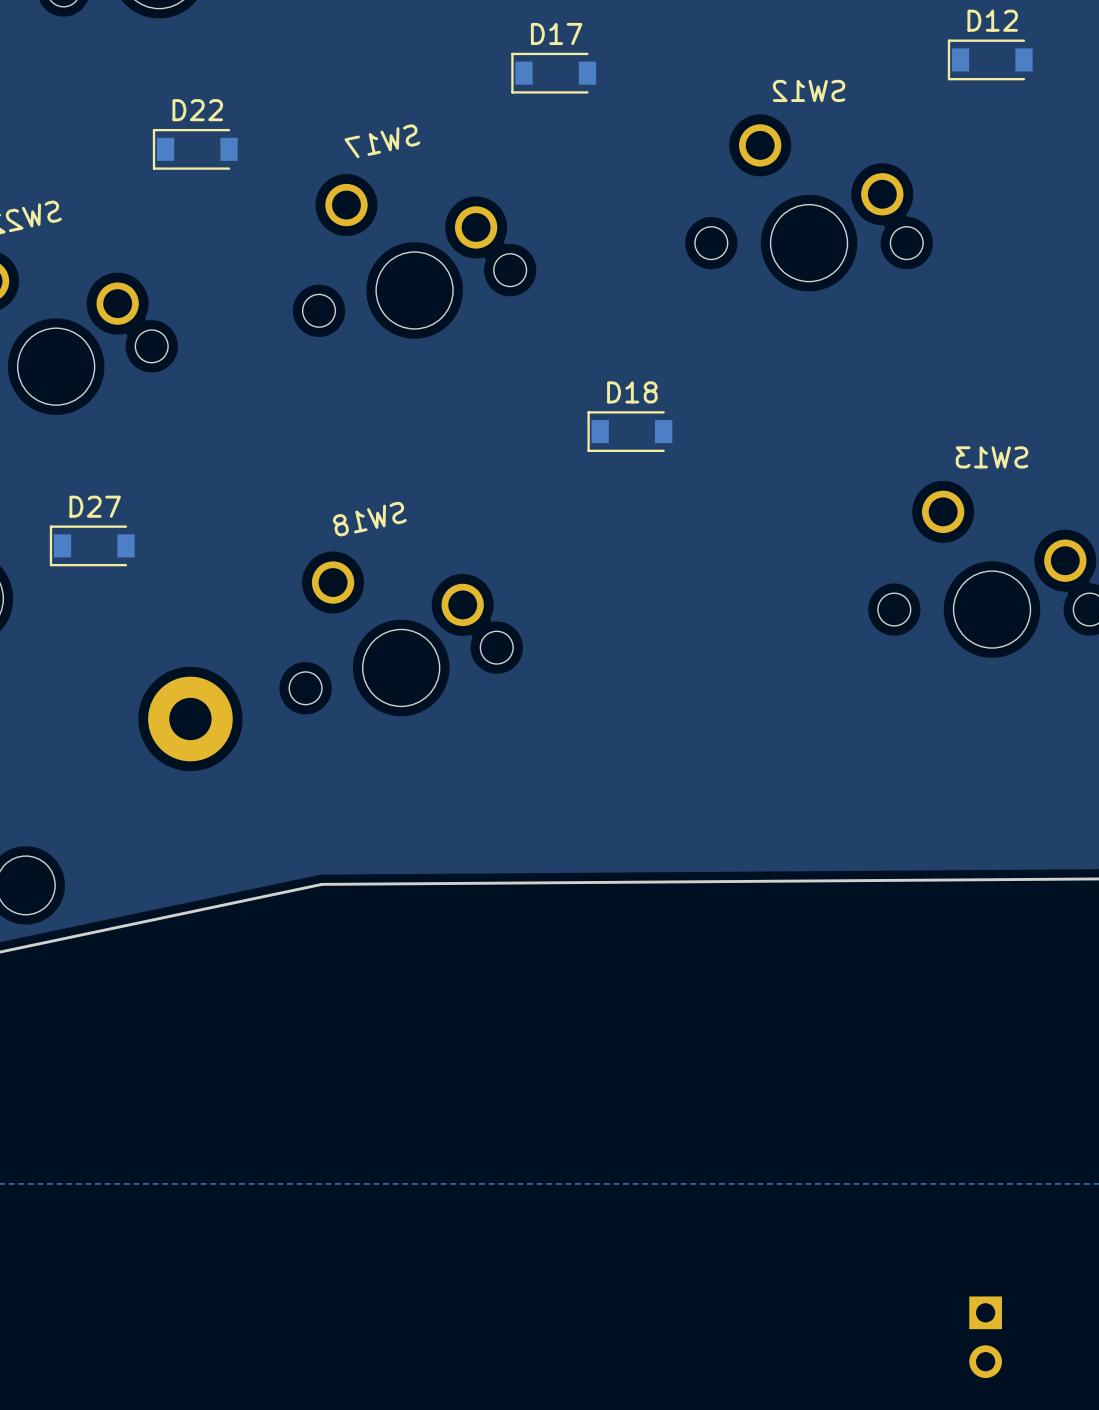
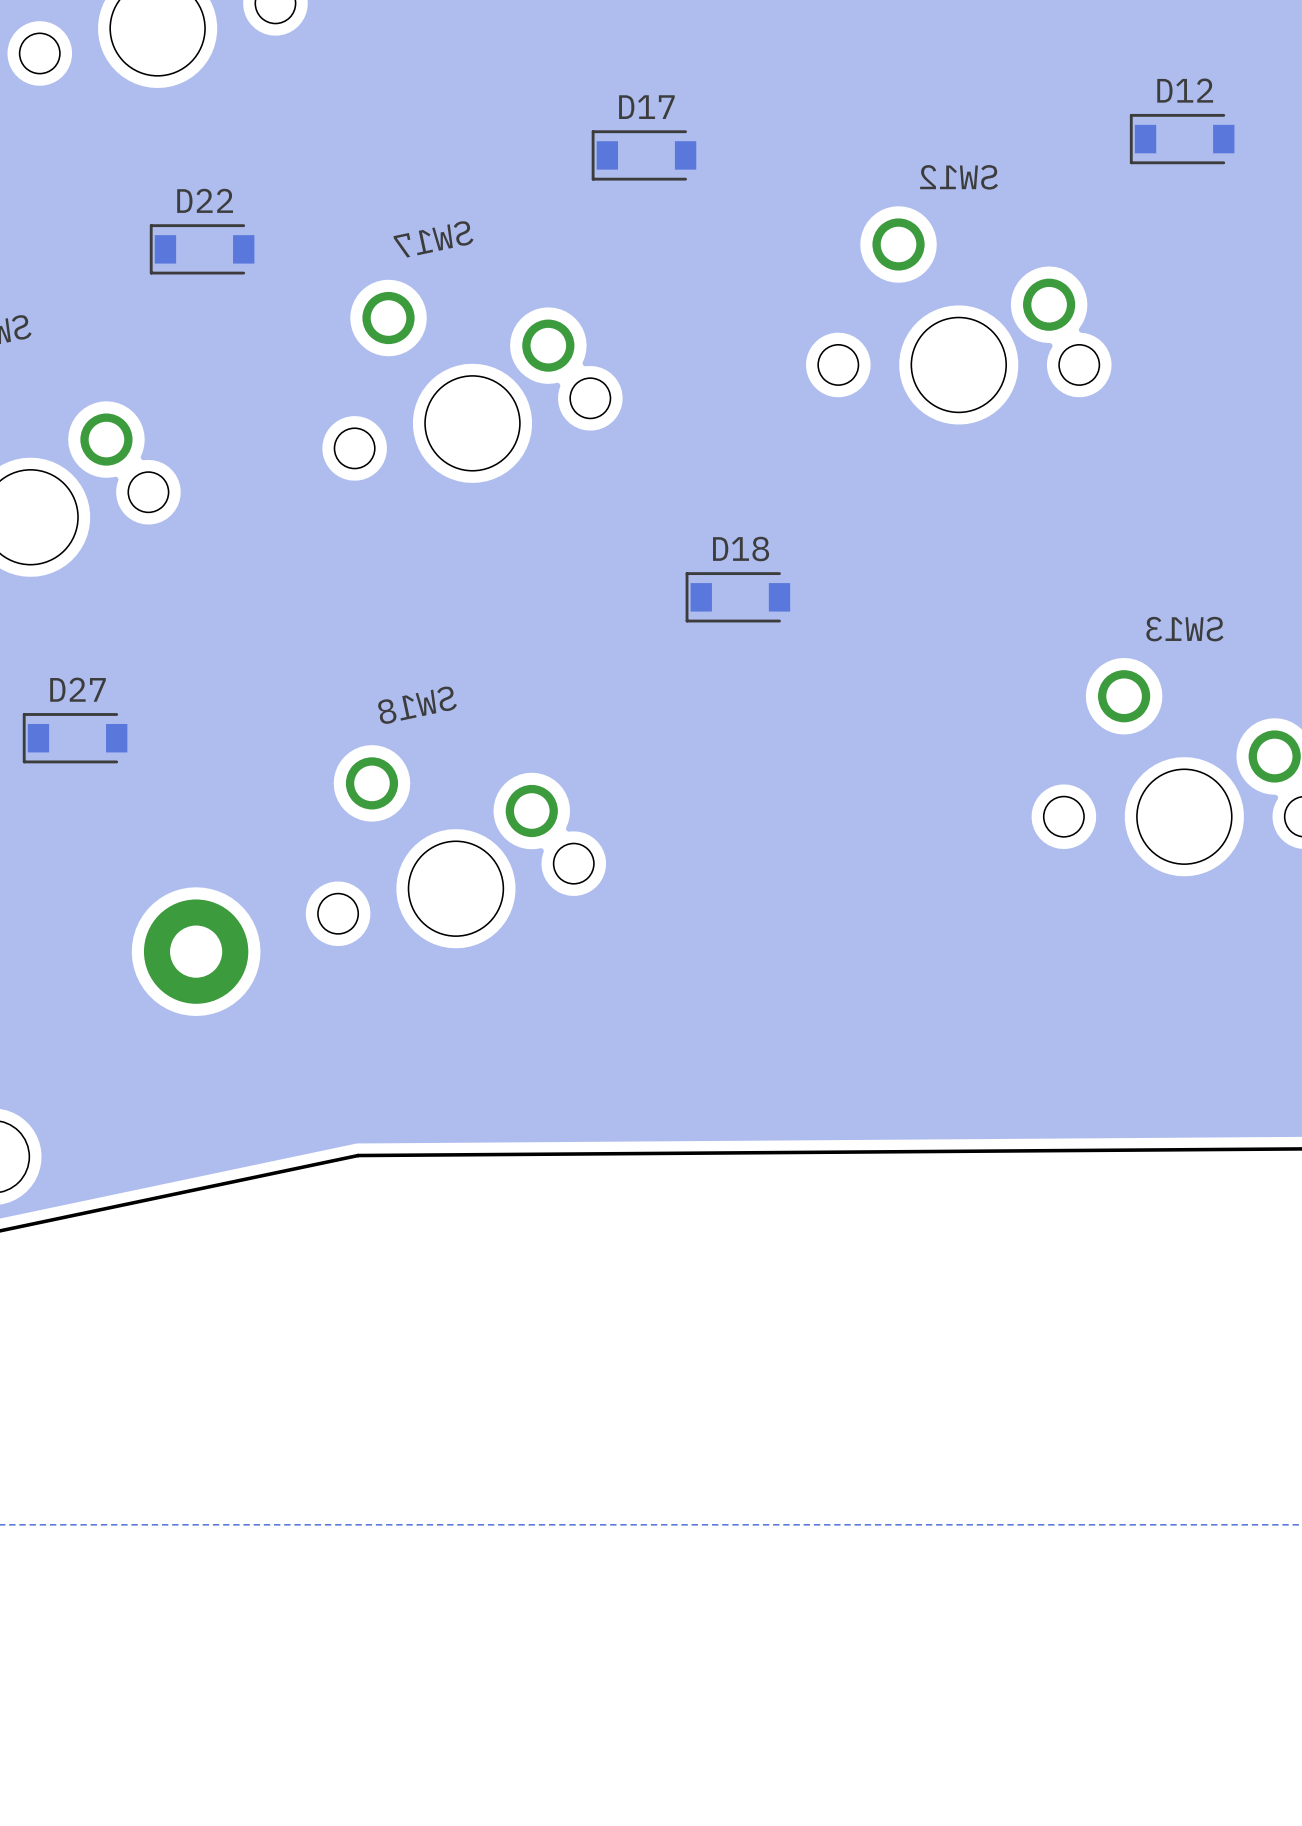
part: (985, 1337) -> none

